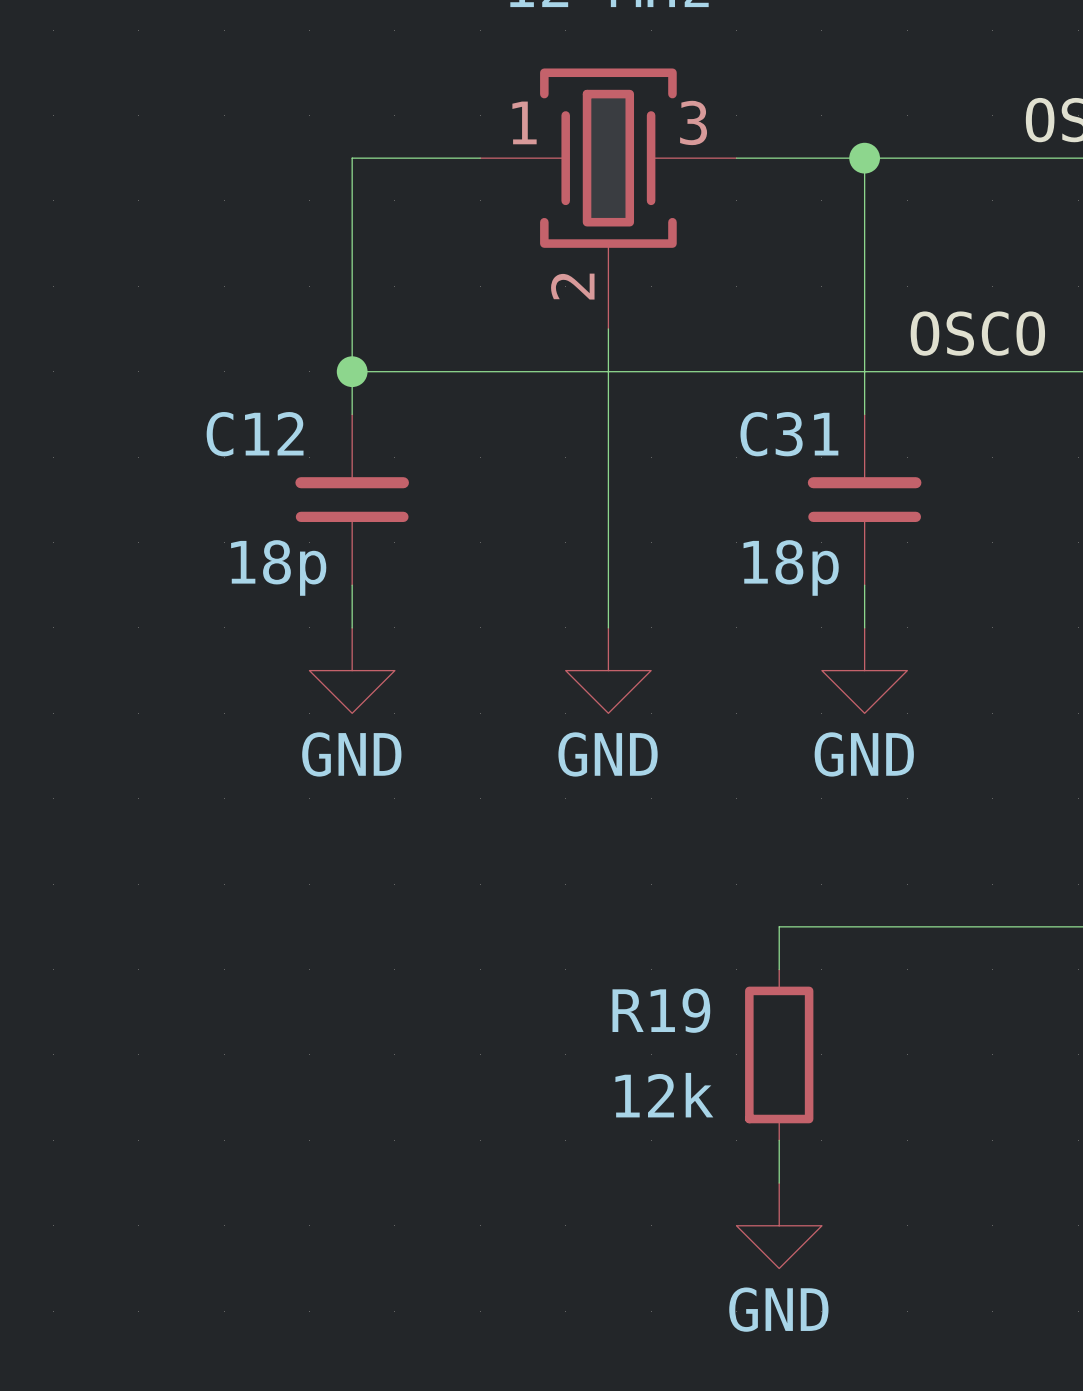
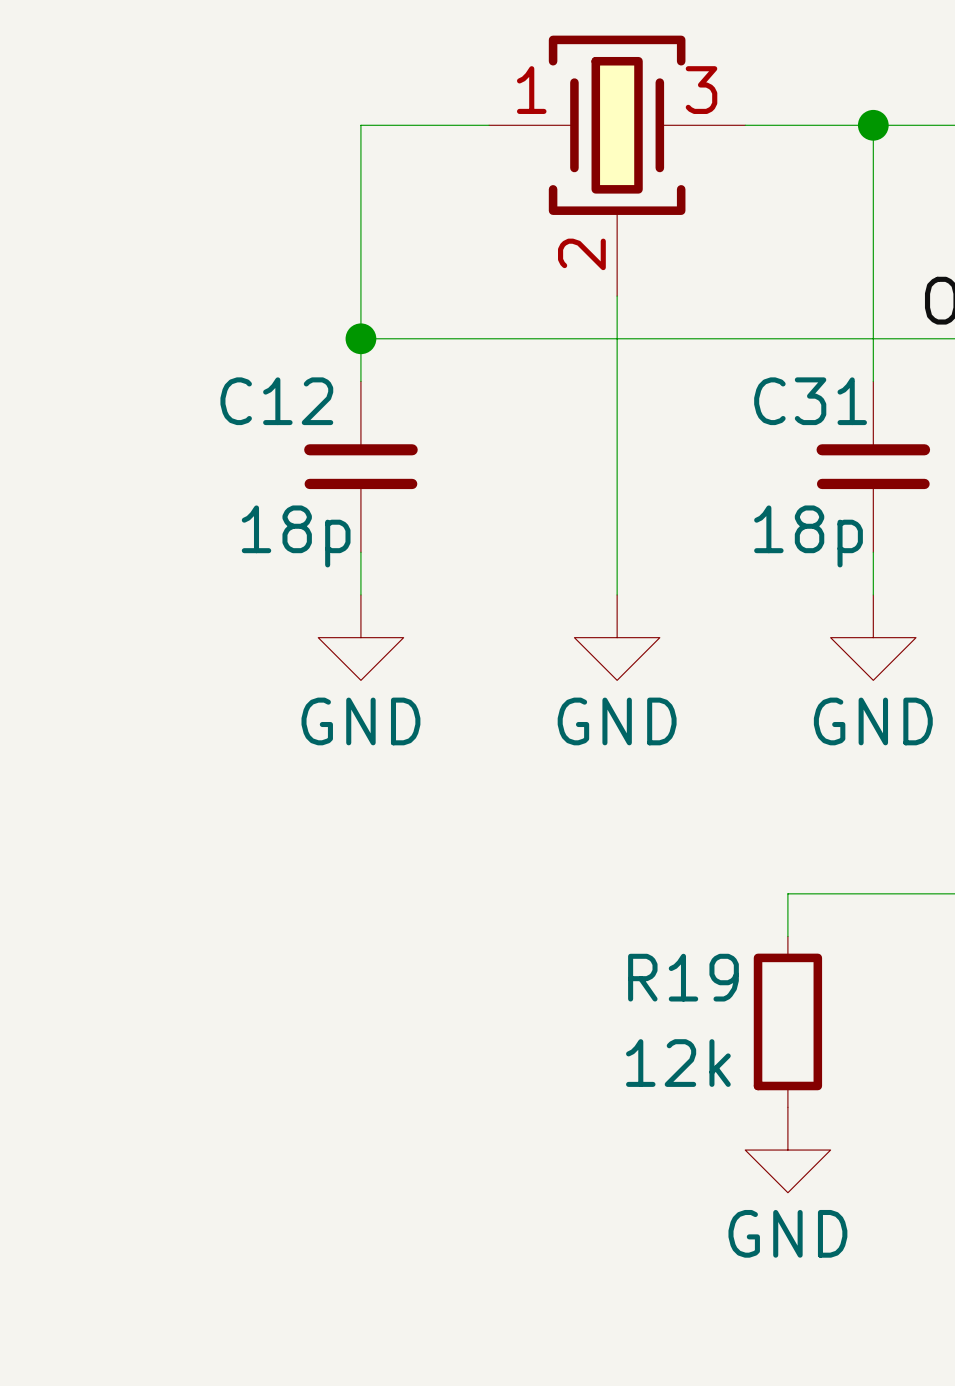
power symbol position: GND (779, 1225) -> GND (787, 1150)

